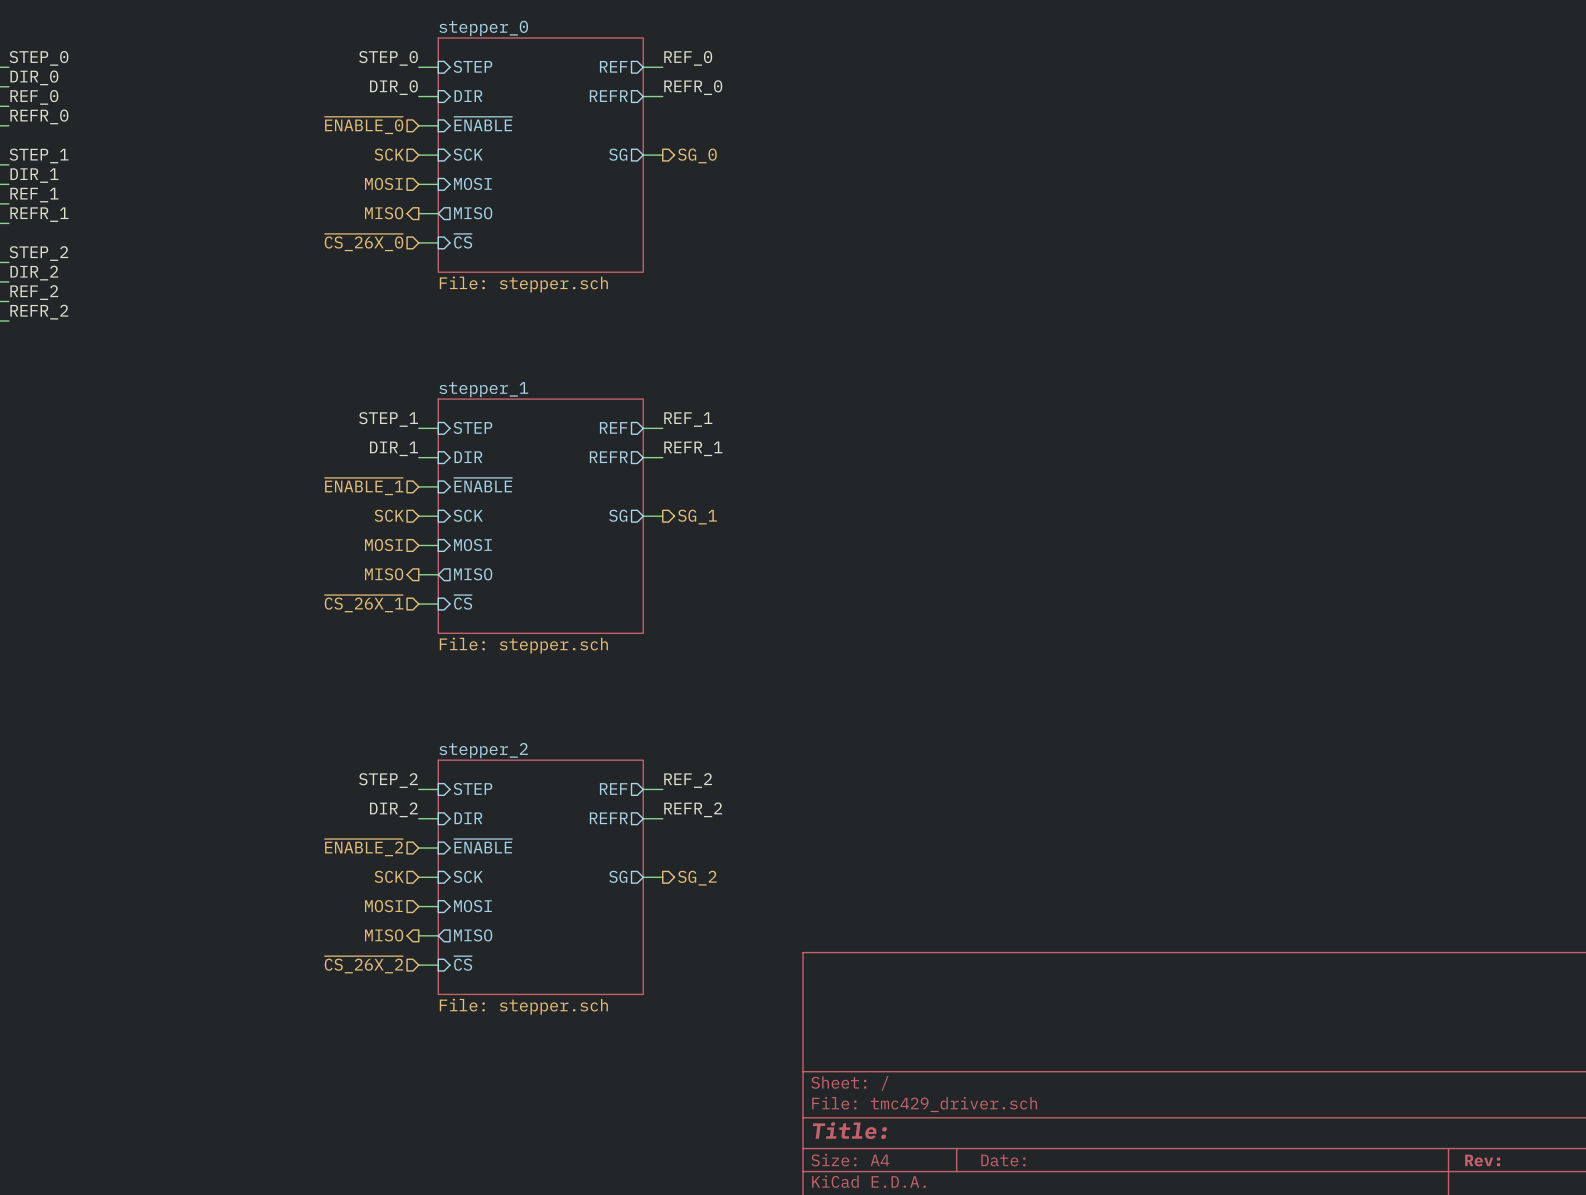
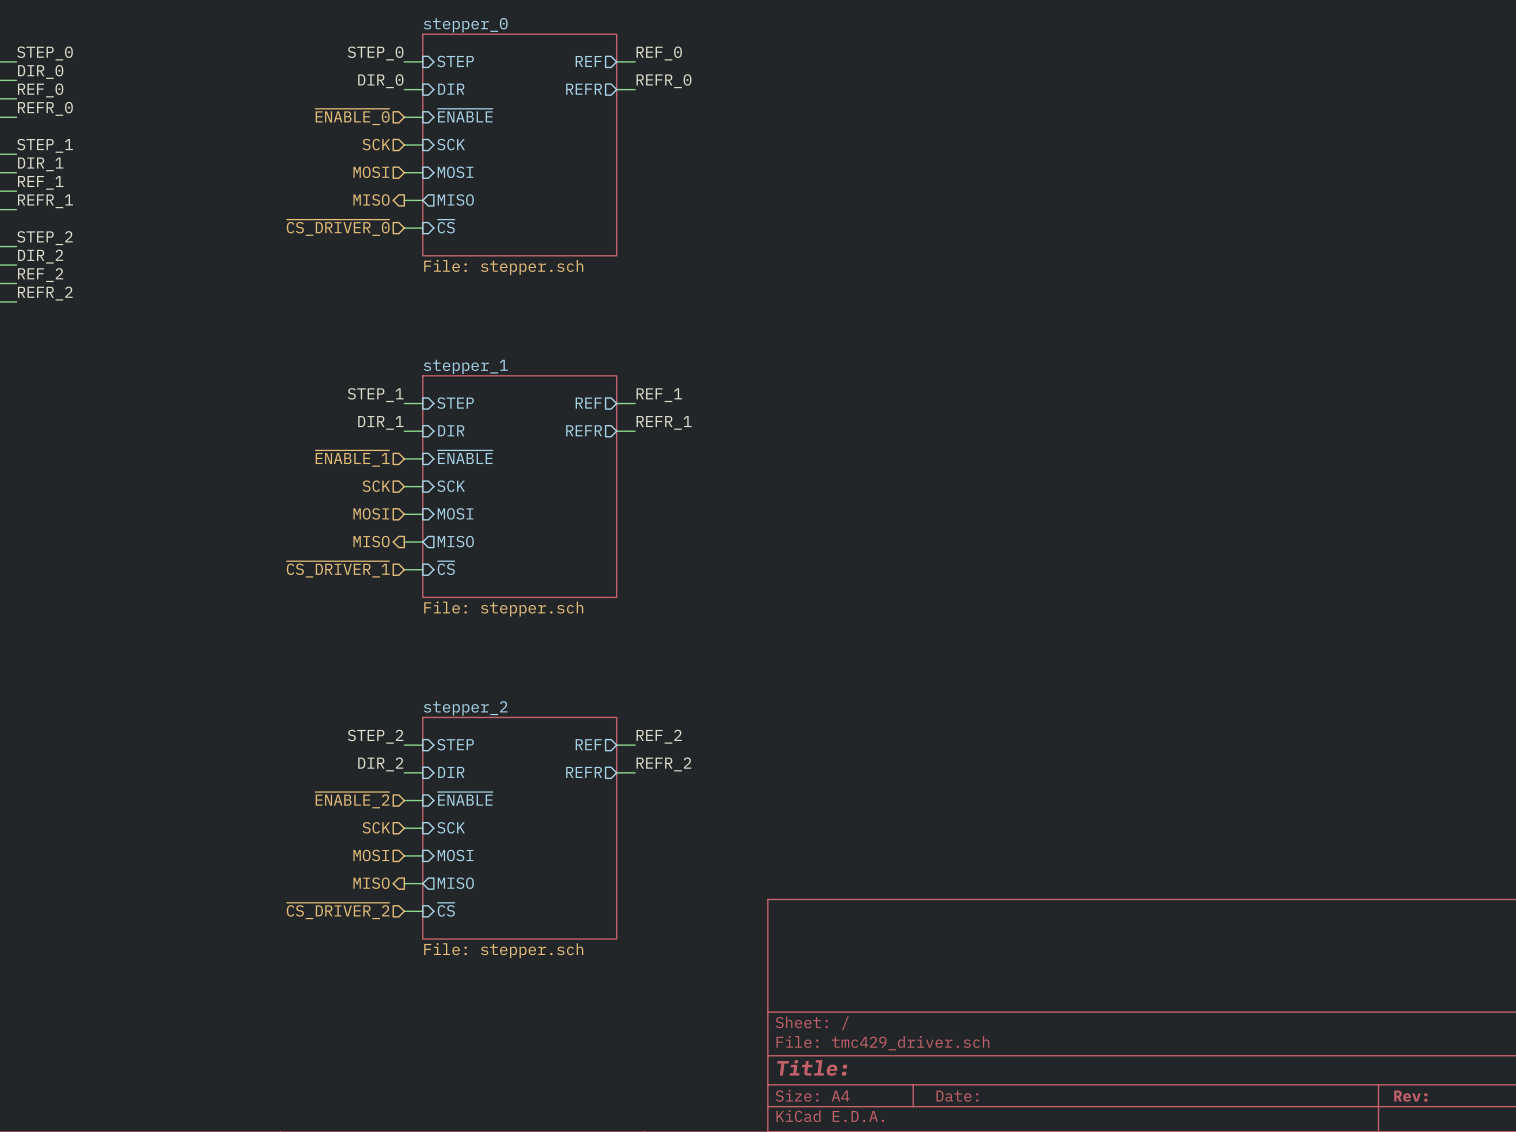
sheet pin: SG (618, 154) -> none
wire: (643, 155) (662, 155) -> none
hierarchical label: SG_0 (697, 155) -> none
hierarchical label: ~{CS_26X_0} (363, 242) -> ~{CS_DRIVER_0} (338, 227)
sheet pin: SG (618, 515) -> none
wire: (643, 516) (662, 516) -> none
hierarchical label: SG_1 (697, 517) -> none
hierarchical label: ~{CS_26X_1} (364, 603) -> ~{CS_DRIVER_1} (338, 569)
sheet pin: SG (618, 876) -> none
wire: (643, 877) (662, 877) -> none
hierarchical label: SG_2 (697, 878) -> none
hierarchical label: ~{CS_26X_2} (363, 964) -> ~{CS_DRIVER_2} (338, 910)

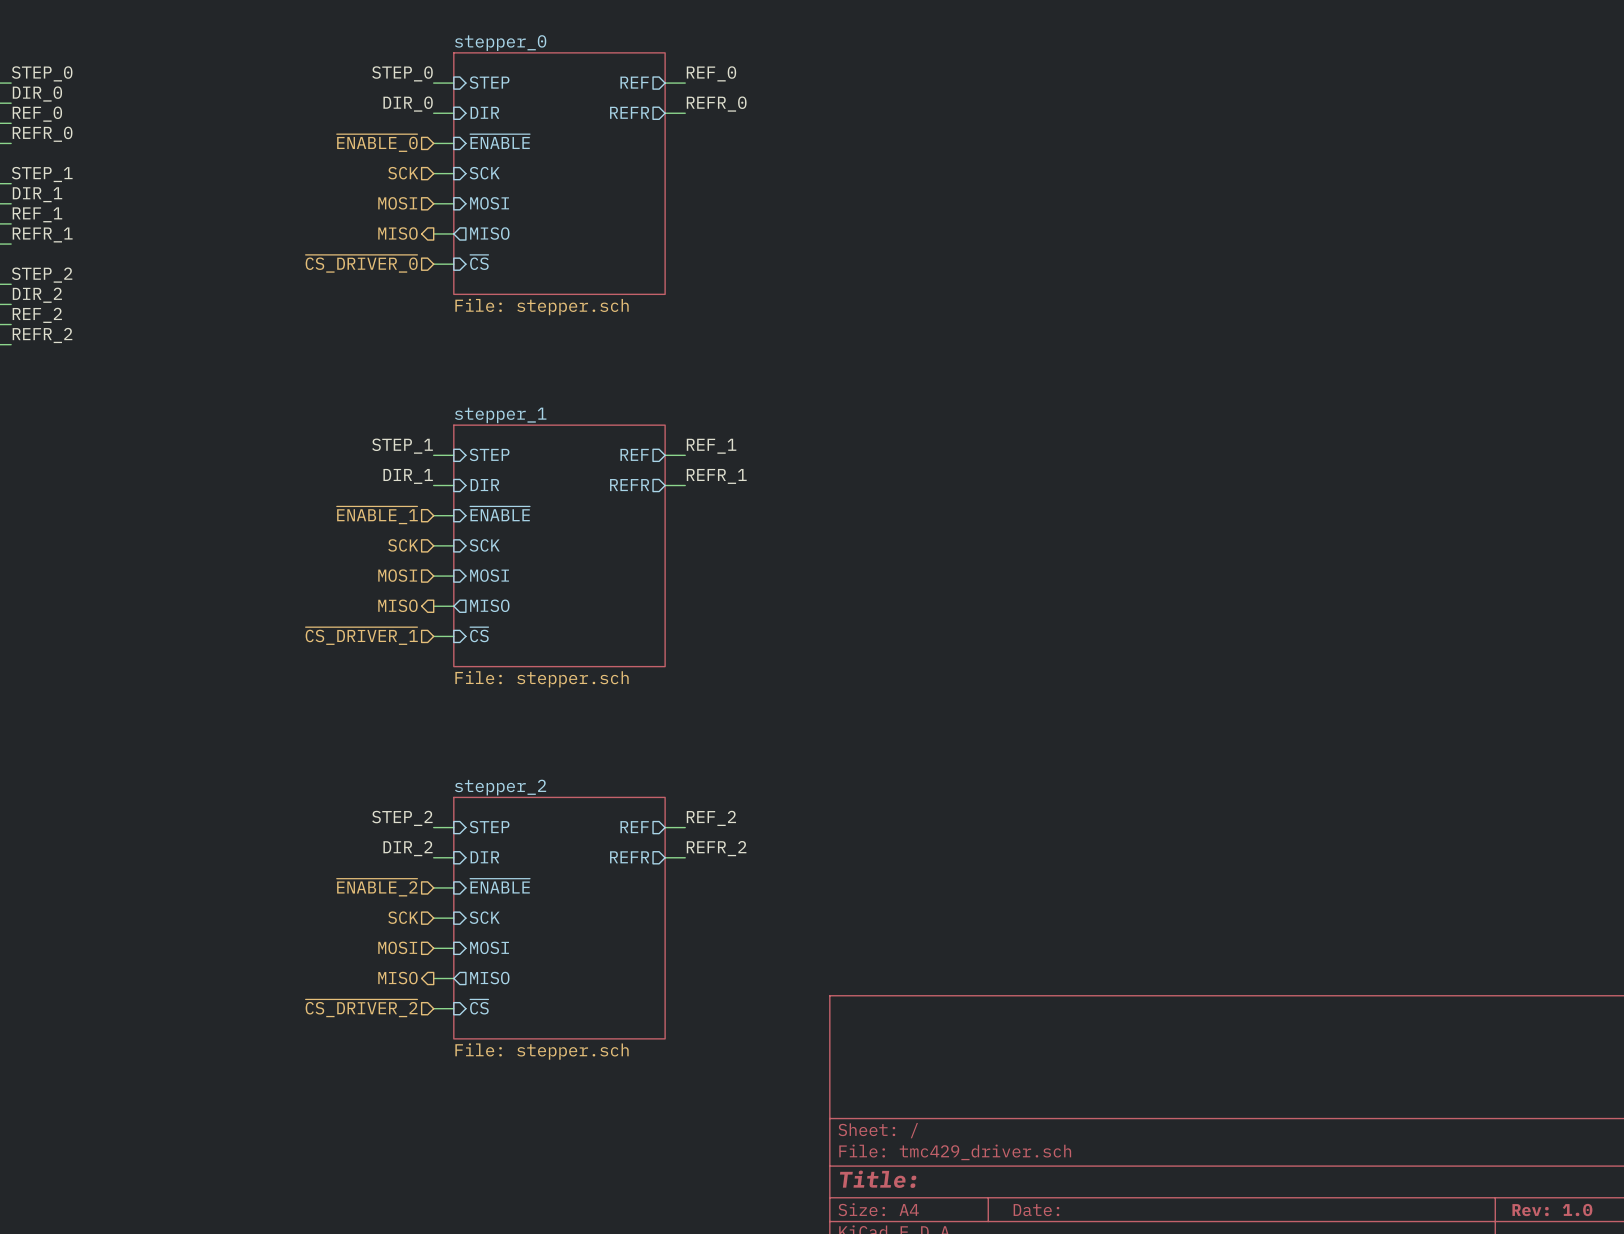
title block: Rev: (1410, 1096) -> Rev: 1.0 (1552, 1210)

